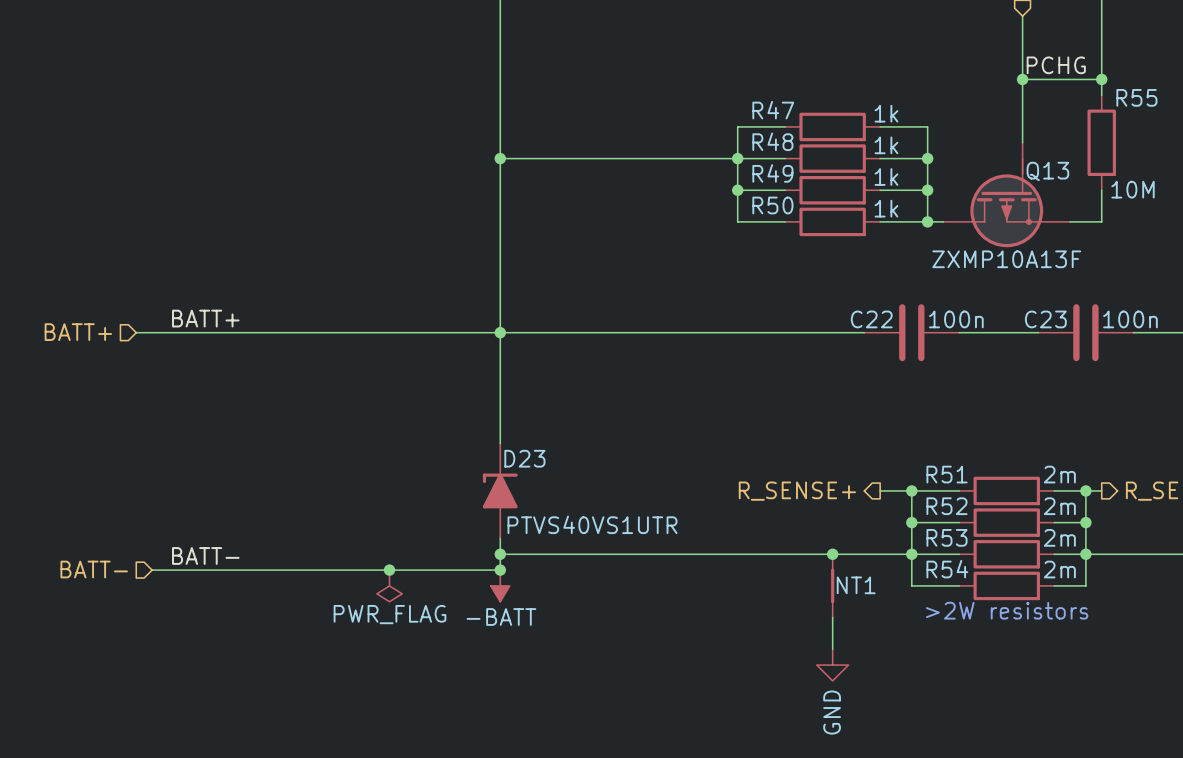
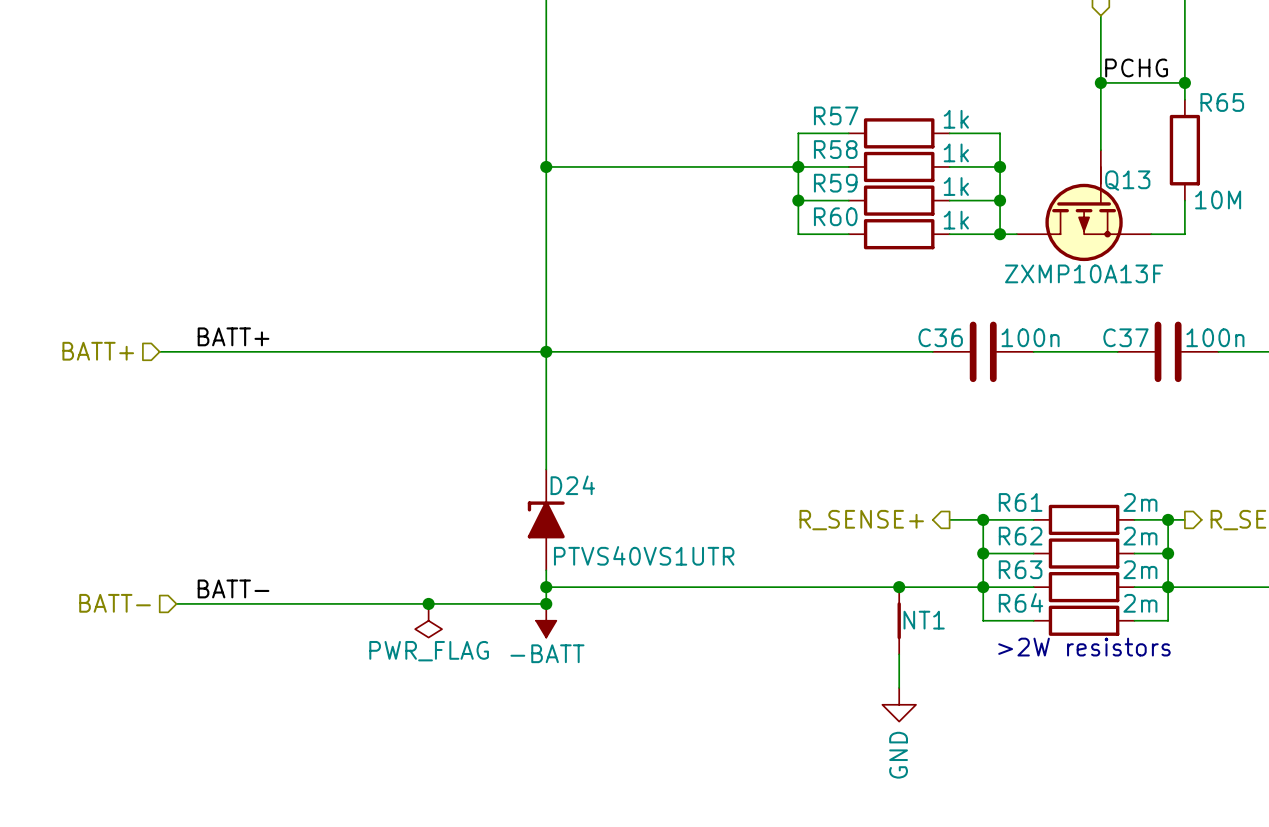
R55 name: R55 (1136, 97) -> R65 (1222, 102)
R47 name: R47 (773, 110) -> R57 (836, 115)
R48 name: R48 (772, 141) -> R58 (835, 149)
R49 name: R49 (772, 173) -> R59 (835, 183)
R50 name: R50 (772, 205) -> R60 (835, 216)
C22 name: C22 (871, 319) -> C36 (940, 337)
C23 name: C23 (1045, 319) -> C37 (1125, 337)
D23 name: D23 (524, 458) -> D24 (572, 485)
R51 name: R51 (947, 474) -> R61 (1020, 502)
R52 name: R52 (947, 506) -> R62 (1020, 536)
R53 name: R53 (947, 537) -> R63 (1020, 569)
R54 name: R54 (947, 569) -> R64 (1021, 602)

